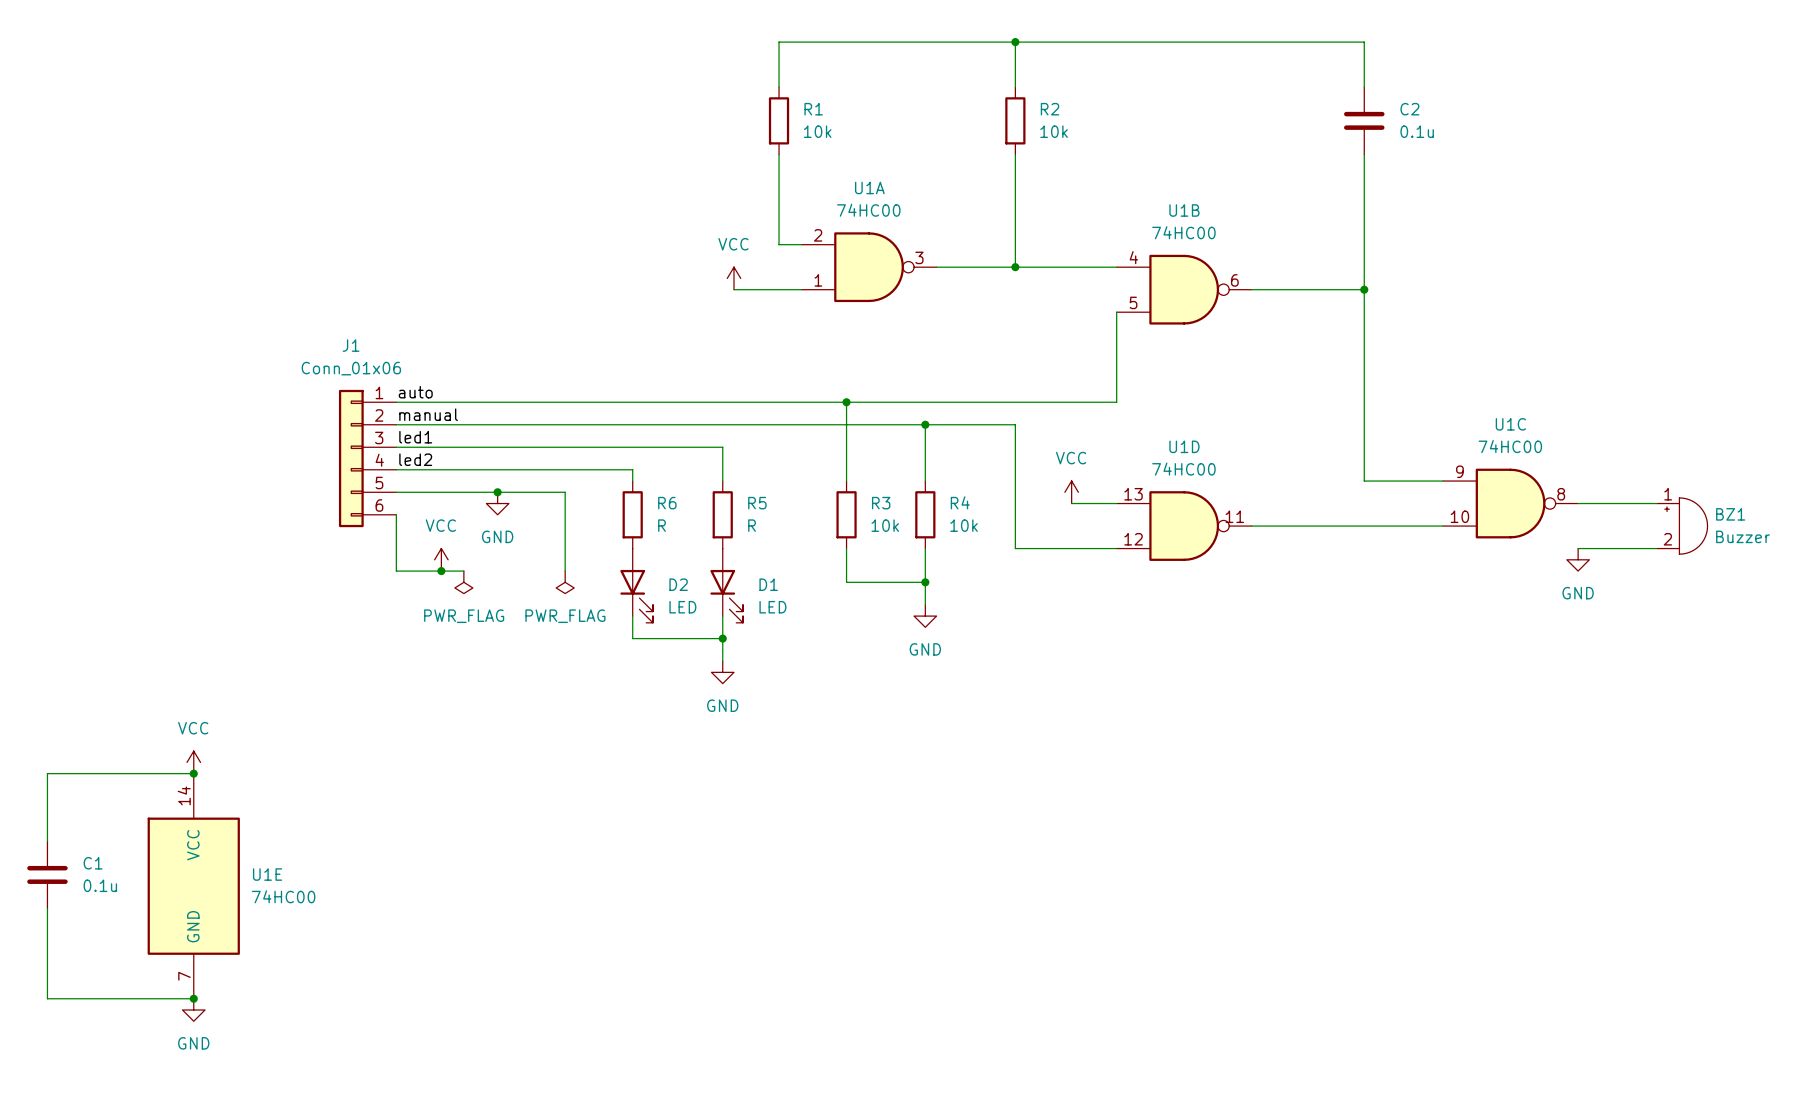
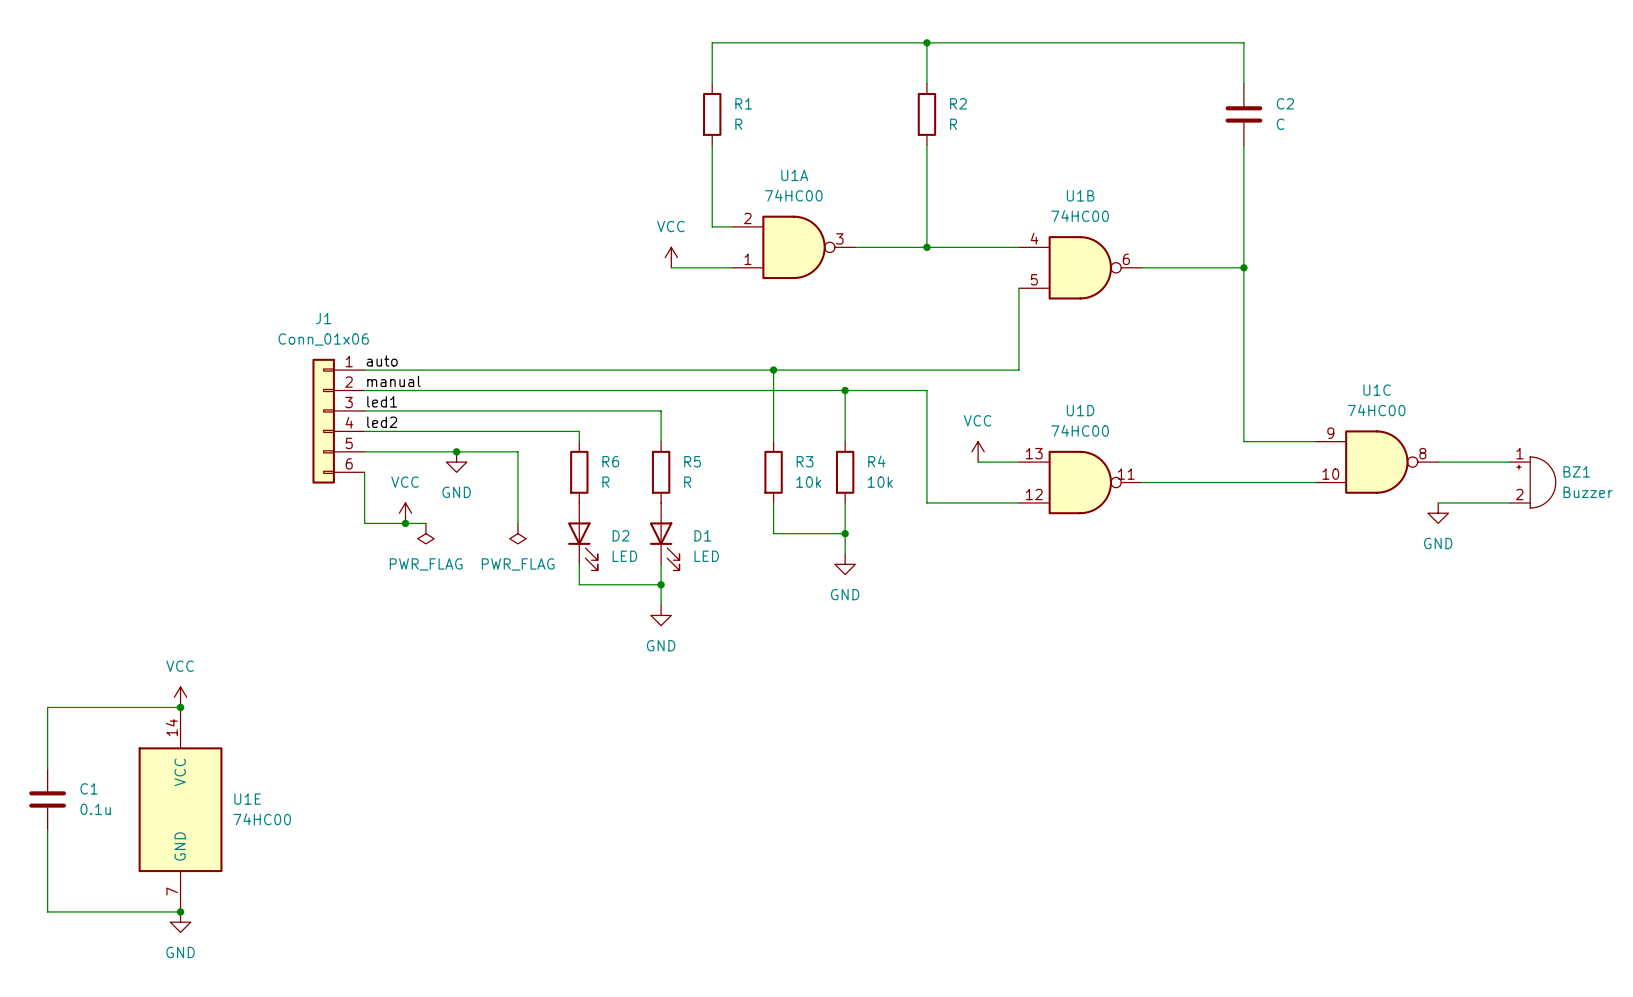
R1 value: 10k (817, 131) -> R (738, 124)
R2 value: 10k (1054, 131) -> R (953, 124)
C2 value: 0.1u (1417, 131) -> C (1280, 124)

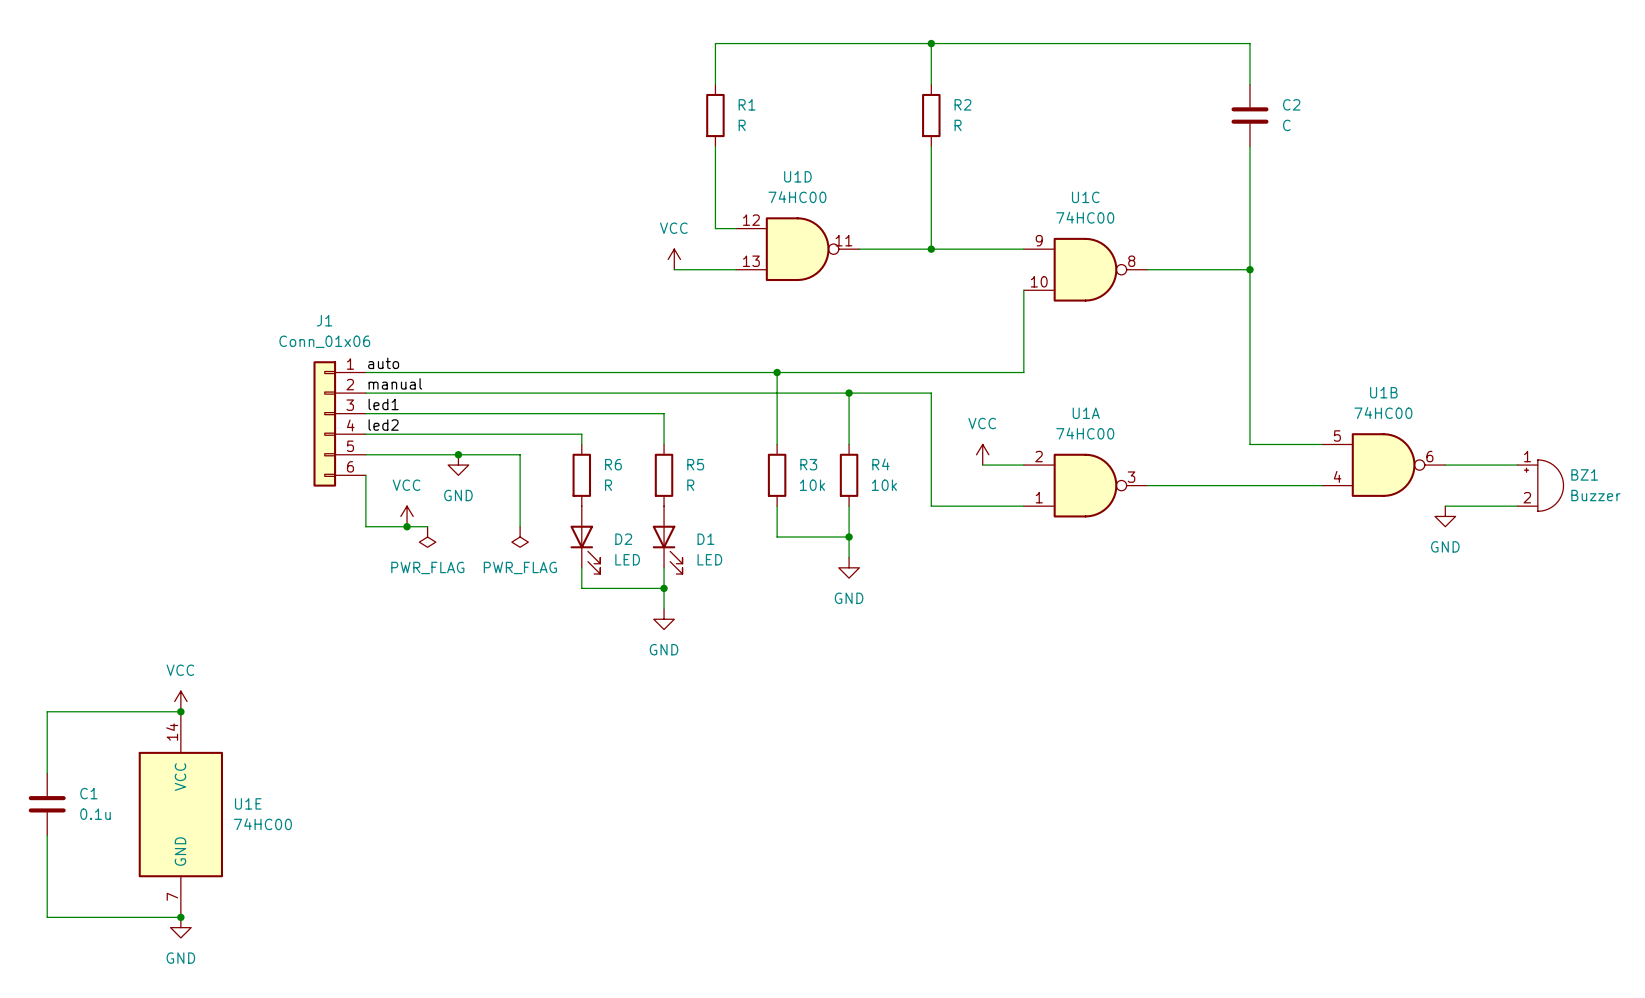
U1A position: (794, 247) -> (1085, 485)
U1B flip: as is (1080, 267) -> up-down (1383, 465)
U1B position: (1080, 267) -> (1383, 465)
U1C position: (1376, 462) -> (1085, 269)
U1D flip: as is (1080, 482) -> up-down (797, 249)
U1D position: (1080, 482) -> (797, 249)

